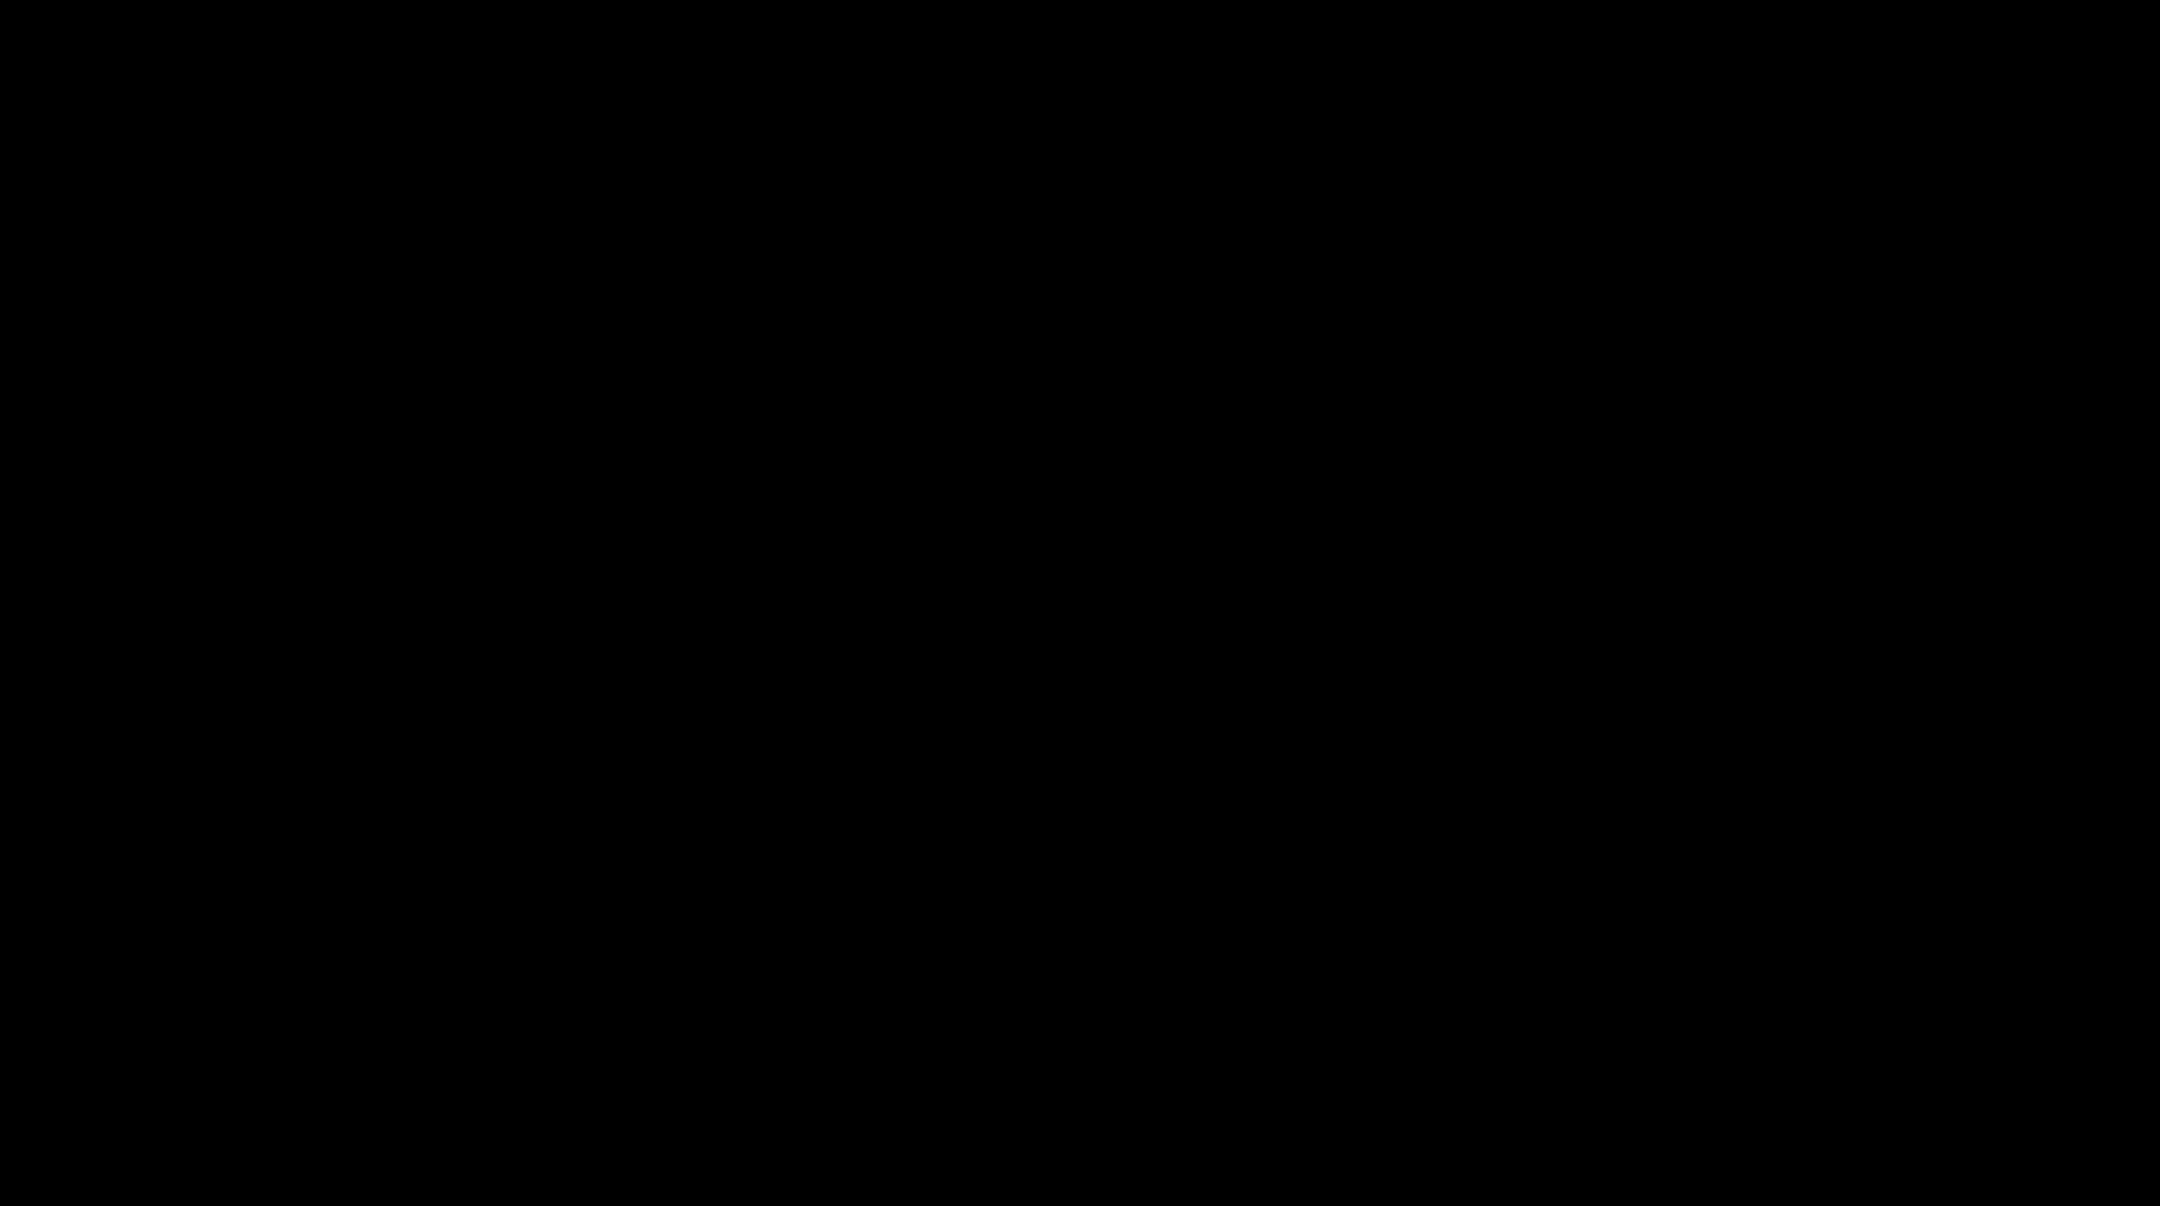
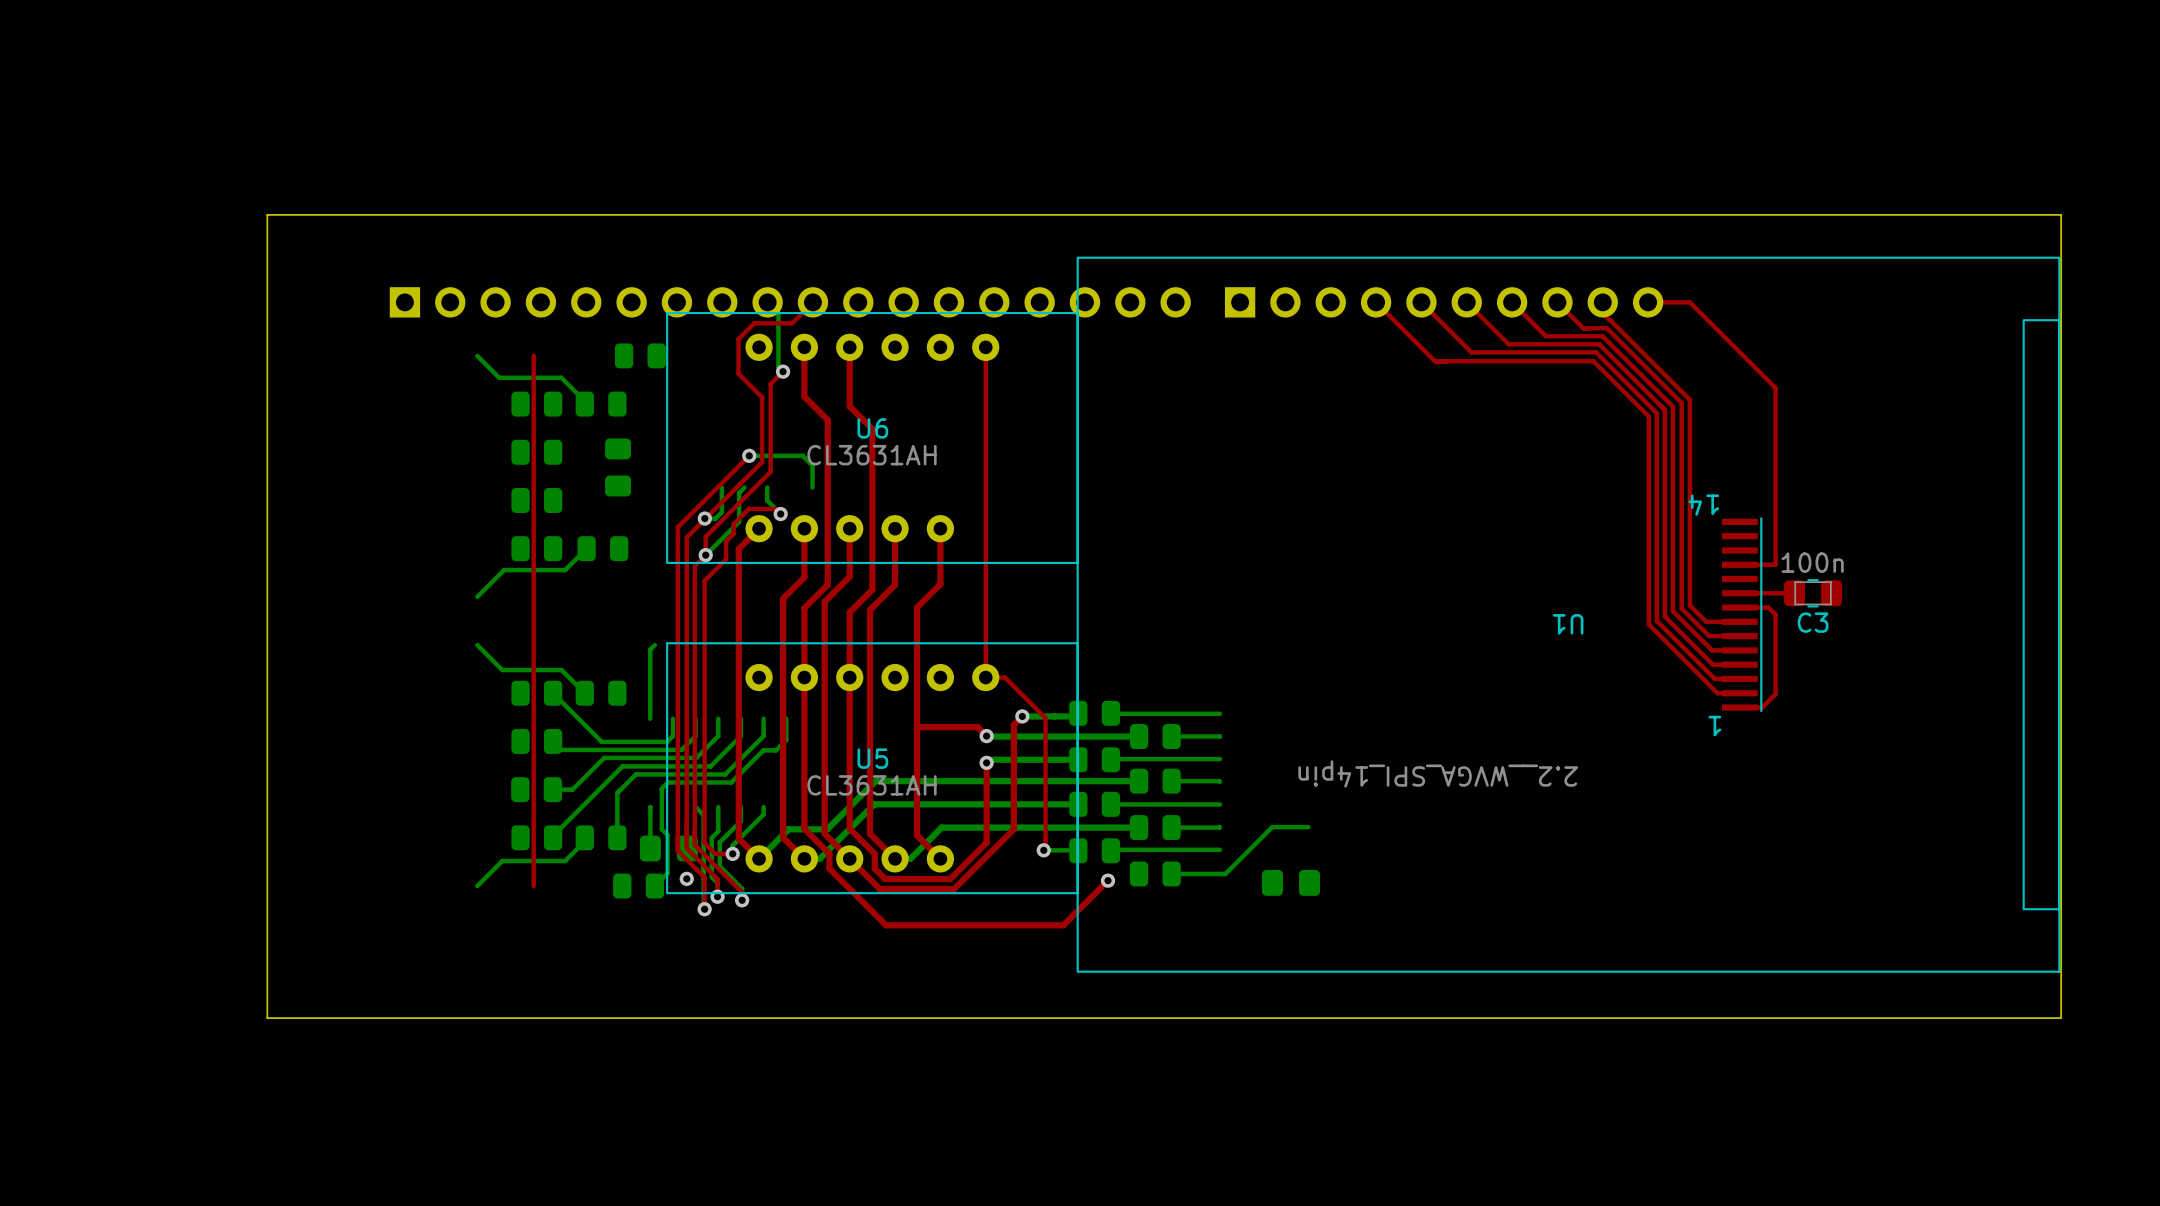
board edge: none -> (267, 214) (2061, 214) (2061, 1018) (267, 1018) (267, 214)
bottom track: none -> (767, 302) (778, 313) (778, 367) (783, 371)
part: none -> (790, 302)
top track: none -> (812, 302) (792, 323) (754, 323) (738, 339) (738, 373) (762, 397) (762, 462) (686, 537) (686, 848) (717, 879) (717, 896)
top track: none -> (1376, 302) (1435, 361) (1593, 361) (1648, 416) (1648, 624) (1717, 693) (1739, 693)
top track: none -> (1421, 302) (1471, 352) (1595, 352) (1656, 413) (1656, 620) (1714, 678) (1739, 678)
part: none -> (1444, 302)
top track: none -> (1466, 302) (1508, 344) (1599, 344) (1664, 409) (1664, 616) (1713, 664) (1739, 664)
top track: none -> (1512, 302) (1546, 336) (1602, 336) (1672, 406) (1672, 611) (1712, 650) (1739, 650)
top track: none -> (1557, 302) (1583, 328) (1606, 328) (1681, 403) (1681, 608) (1709, 636) (1739, 636)
top track: none -> (1602, 302) (1602, 313) (1689, 399) (1689, 605) (1706, 621) (1739, 621)
top track: none -> (1648, 302) (1689, 302) (1775, 388) (1775, 564) (1739, 564)
top track: none -> (804, 347) (804, 396) (827, 420) (827, 584) (804, 608) (804, 828) (829, 853) (829, 868) (886, 925) (1063, 925) (1108, 880)
top track: none -> (849, 347) (849, 406) (872, 429) (872, 589) (849, 612) (849, 828) (874, 853) (874, 868) (885, 879) (950, 879) (986, 842) (986, 762)
top track: none -> (985, 347) (985, 677) (1004, 677) (1045, 718) (1045, 848) (1043, 850)
bottom track: none -> (477, 355) (499, 377) (561, 377) (584, 401) (584, 404)
top track: none -> (533, 355) (533, 886)
part: none -> (640, 355)
top track: none -> (783, 371) (770, 384) (770, 471) (705, 536) (705, 555) (694, 566) (694, 845) (742, 892) (742, 899)
via: none -> (783, 371)
part: none -> (536, 404)
part: none -> (601, 404)
U6: none -> CL3631AH (872, 438)
part: none -> (536, 452)
bottom track: none -> (749, 455) (802, 455) (812, 465) (812, 487)
top track: none -> (749, 455) (677, 527) (677, 850) (704, 877) (704, 909)
via: none -> (749, 455)
part: none -> (618, 467)
bottom track: none -> (721, 487) (721, 512) (715, 518) (704, 518)
bottom track: none -> (744, 487) (739, 492) (739, 521) (705, 555)
bottom track: none -> (767, 487) (767, 500) (780, 514)
part: none -> (536, 500)
top track: none -> (780, 514) (775, 508) (748, 508) (733, 524) (733, 533) (726, 541) (726, 559) (704, 580) (704, 843) (715, 853) (732, 853)
via: none -> (780, 514)
via: none -> (704, 518)
top track: none -> (759, 528) (738, 548) (738, 838) (759, 858)
top track: none -> (804, 528) (804, 577) (783, 598) (783, 837) (804, 858)
top track: none -> (849, 528) (849, 576) (824, 601) (824, 833) (879, 888) (954, 888) (1013, 829) (1013, 724) (1022, 716)
top track: none -> (895, 528) (895, 584) (870, 609) (870, 833) (895, 858)
top track: none -> (940, 528) (940, 584) (917, 607) (917, 835) (940, 858)
part: none -> (536, 548)
bottom track: none -> (586, 548) (565, 570) (504, 570) (477, 596)
part: none -> (602, 548)
via: none -> (705, 555)
top track: none -> (1739, 593) (1794, 593)
C3: none -> 100n (1813, 593)
top track: none -> (1739, 607) (1768, 607) (1775, 614) (1775, 694) (1762, 707) (1739, 707)
U1: none -> 2.2__WVGA_SPI_14pin (1568, 614)
bottom track: none -> (477, 645) (502, 670) (561, 670) (584, 693)
bottom track: none -> (654, 645) (650, 649) (650, 718)
part: none -> (536, 693)
bottom track: none -> (553, 693) (601, 741) (667, 741) (672, 736) (672, 718)
part: none -> (601, 693)
bottom track: none -> (1078, 713) (1075, 716) (1022, 716)
part: none -> (1094, 713)
bottom track: none -> (1110, 713) (1220, 713)
via: none -> (1022, 716)
bottom track: none -> (695, 718) (695, 736) (681, 749) (561, 749) (553, 741)
bottom track: none -> (718, 718) (718, 736) (696, 757) (604, 757) (572, 789) (552, 789)
bottom track: none -> (740, 718) (740, 736) (710, 766) (622, 766) (553, 837)
bottom track: none -> (763, 718) (763, 736) (725, 774) (635, 774) (617, 792) (617, 837)
bottom track: none -> (786, 718) (786, 740) (776, 750) (763, 750) (731, 782) (667, 782) (661, 788) (661, 829) (667, 835) (667, 873) (654, 886)
top track: none -> (917, 727) (977, 727) (986, 736)
bottom track: none -> (986, 736) (1139, 736)
via: none -> (986, 736)
part: none -> (1155, 736)
bottom track: none -> (1171, 736) (1219, 736)
part: none -> (536, 741)
bottom track: none -> (1078, 759) (989, 759) (986, 762)
part: none -> (1094, 759)
bottom track: none -> (1220, 759) (1110, 759)
via: none -> (986, 762)
U5: none -> CL3631AH (872, 768)
bottom track: none -> (1139, 781) (875, 781) (827, 829) (788, 829) (759, 858)
part: none -> (1155, 781)
bottom track: none -> (1171, 781) (1220, 781)
part: none -> (536, 789)
bottom track: none -> (1078, 804) (874, 804) (819, 858) (804, 858)
part: none -> (1094, 804)
bottom track: none -> (1111, 804) (1220, 804)
bottom track: none -> (650, 807) (650, 848)
bottom track: none -> (695, 807) (703, 815) (704, 909)
bottom track: none -> (718, 807) (718, 831) (711, 837) (711, 877) (717, 882) (717, 896)
bottom track: none -> (740, 807) (740, 821) (719, 842) (719, 866) (742, 888) (742, 899)
bottom track: none -> (763, 807) (763, 814) (732, 845) (732, 853)
bottom track: none -> (1139, 827) (941, 827) (910, 858) (895, 858)
part: none -> (1155, 827)
bottom track: none -> (1220, 827) (1171, 827)
bottom track: none -> (1308, 827) (1272, 827) (1225, 873) (1171, 873)
part: none -> (536, 837)
bottom track: none -> (588, 837) (565, 861) (502, 861) (477, 886)
part: none -> (601, 837)
part: none -> (668, 848)
bottom track: none -> (1220, 849) (1110, 850)
bottom track: none -> (1043, 850) (1078, 850)
via: none -> (1043, 850)
part: none -> (1094, 850)
via: none -> (732, 853)
part: none -> (1155, 873)
via: none -> (686, 878)
via: none -> (1108, 880)
part: none -> (1291, 882)
part: none -> (638, 886)
via: none -> (717, 896)
via: none -> (742, 900)
via: none -> (704, 909)

